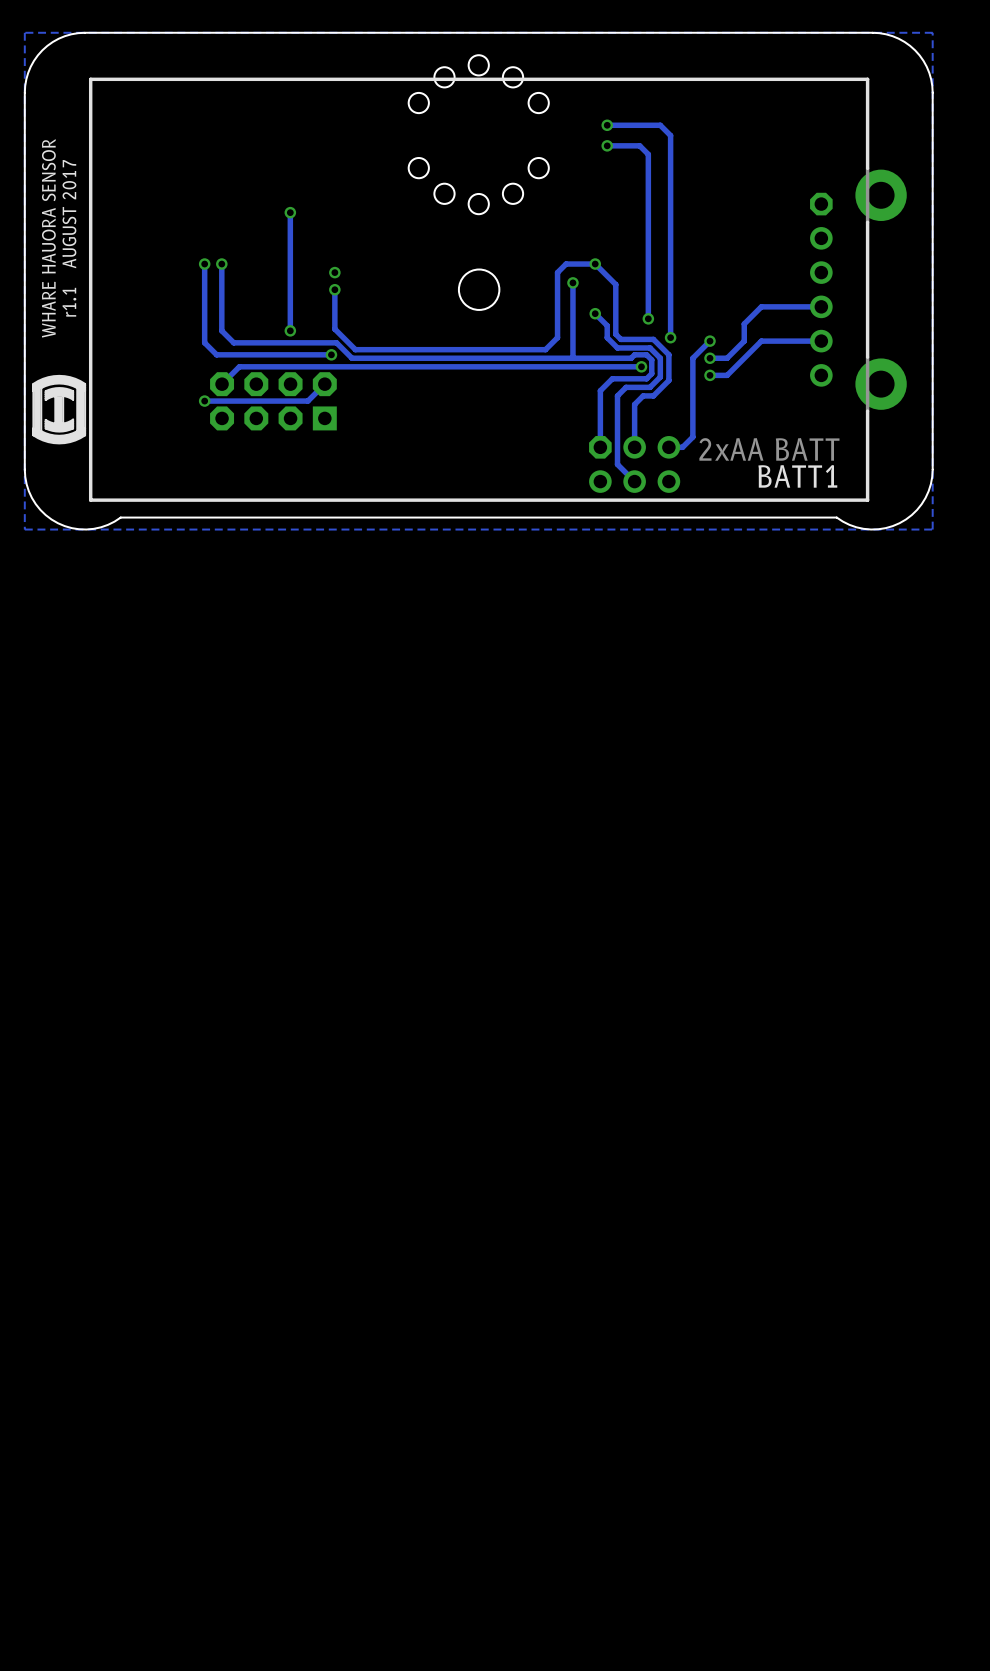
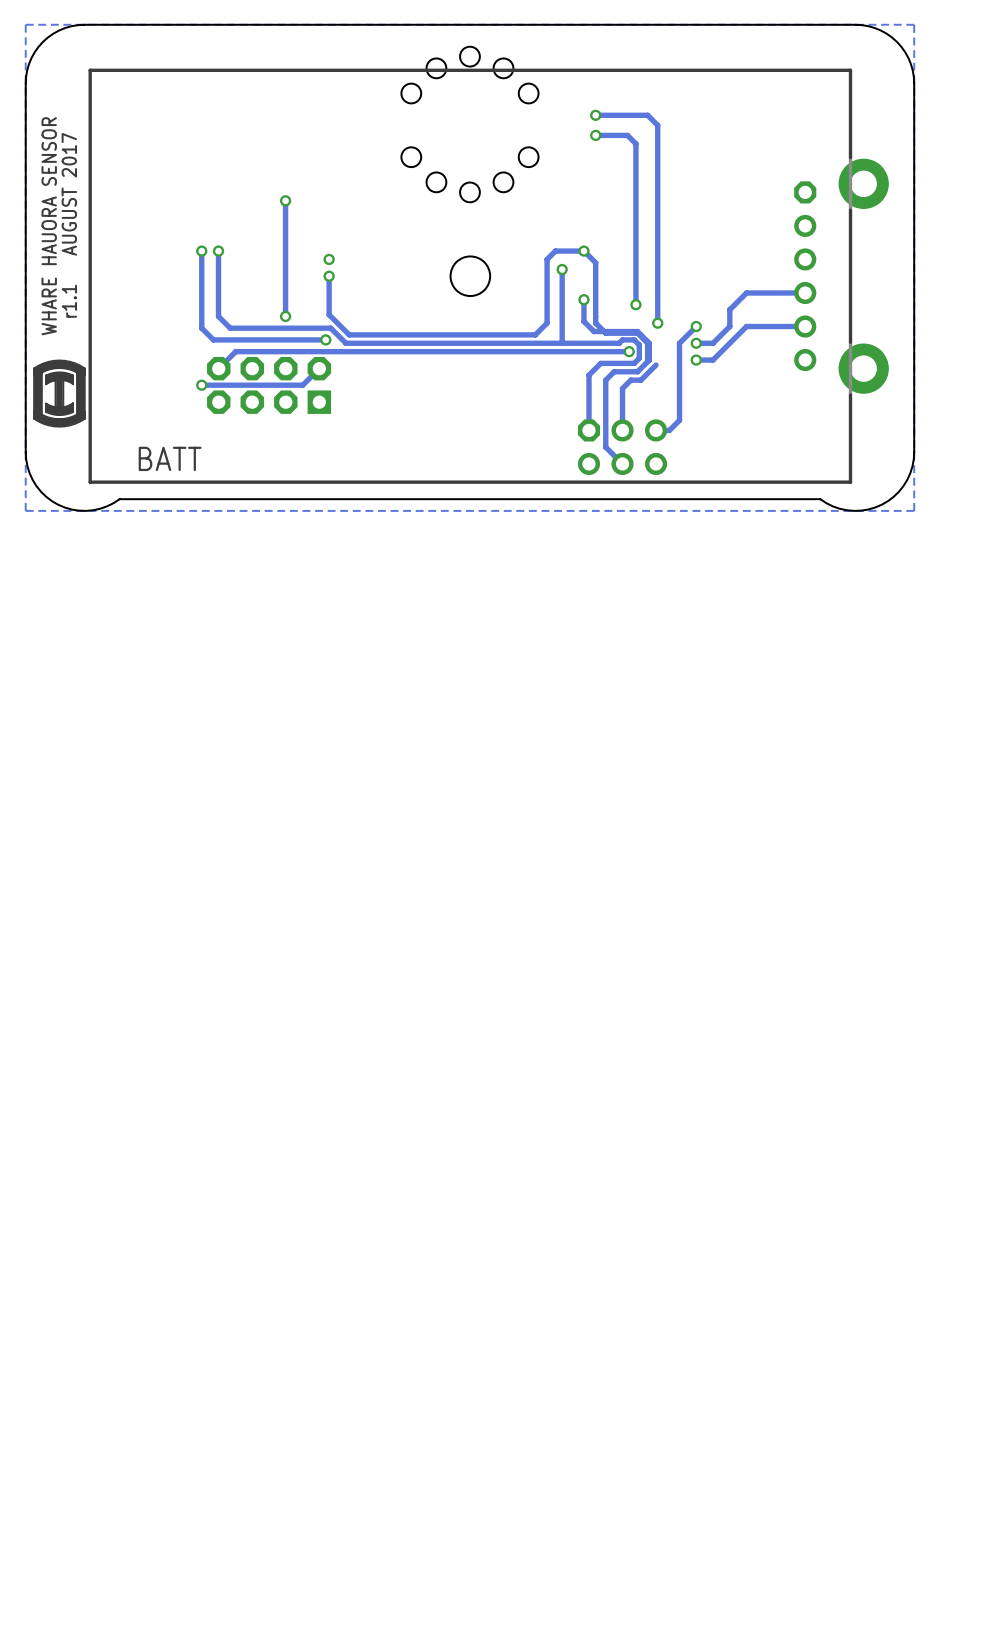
track: (607, 276) (615, 284) (615, 334) (620, 339) (653, 339) (668, 354) (668, 380) -> none
track: (595, 313) (607, 325) -> (595, 262) (595, 311)
track: none -> (583, 299) (583, 321) (594, 331) (637, 331) (649, 343) (649, 360) (647, 361)
BATT1 text: 2xAA BATT (769, 449) -> none
BATT1 name: BATT1 (797, 476) -> BATT (170, 458)

